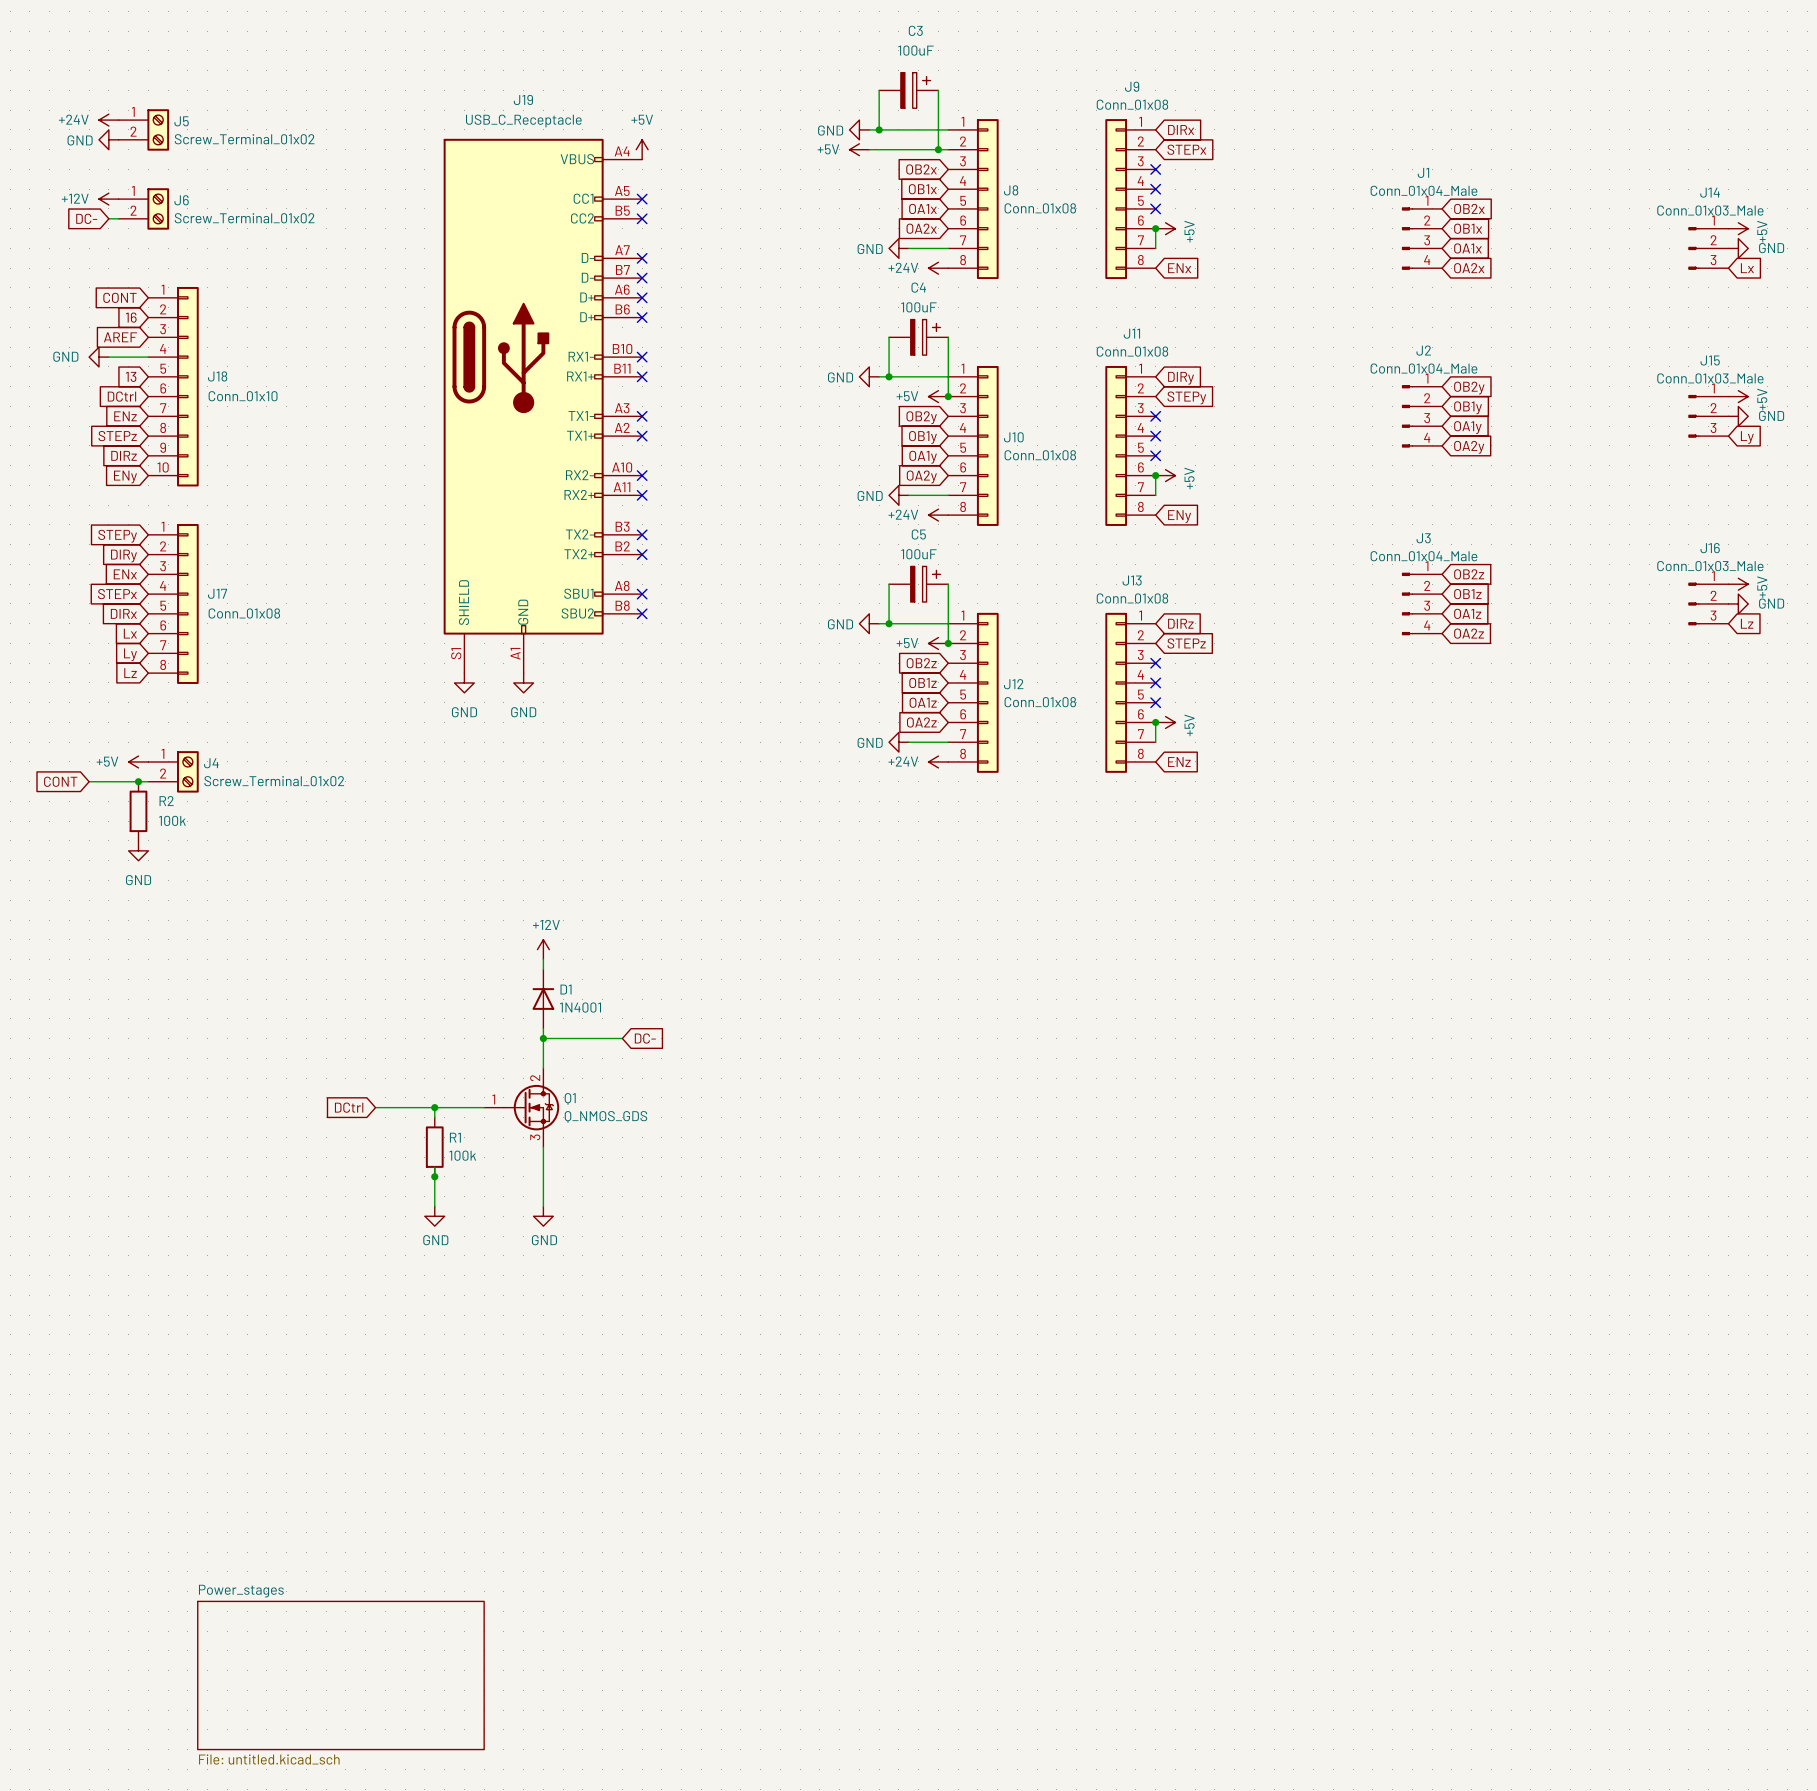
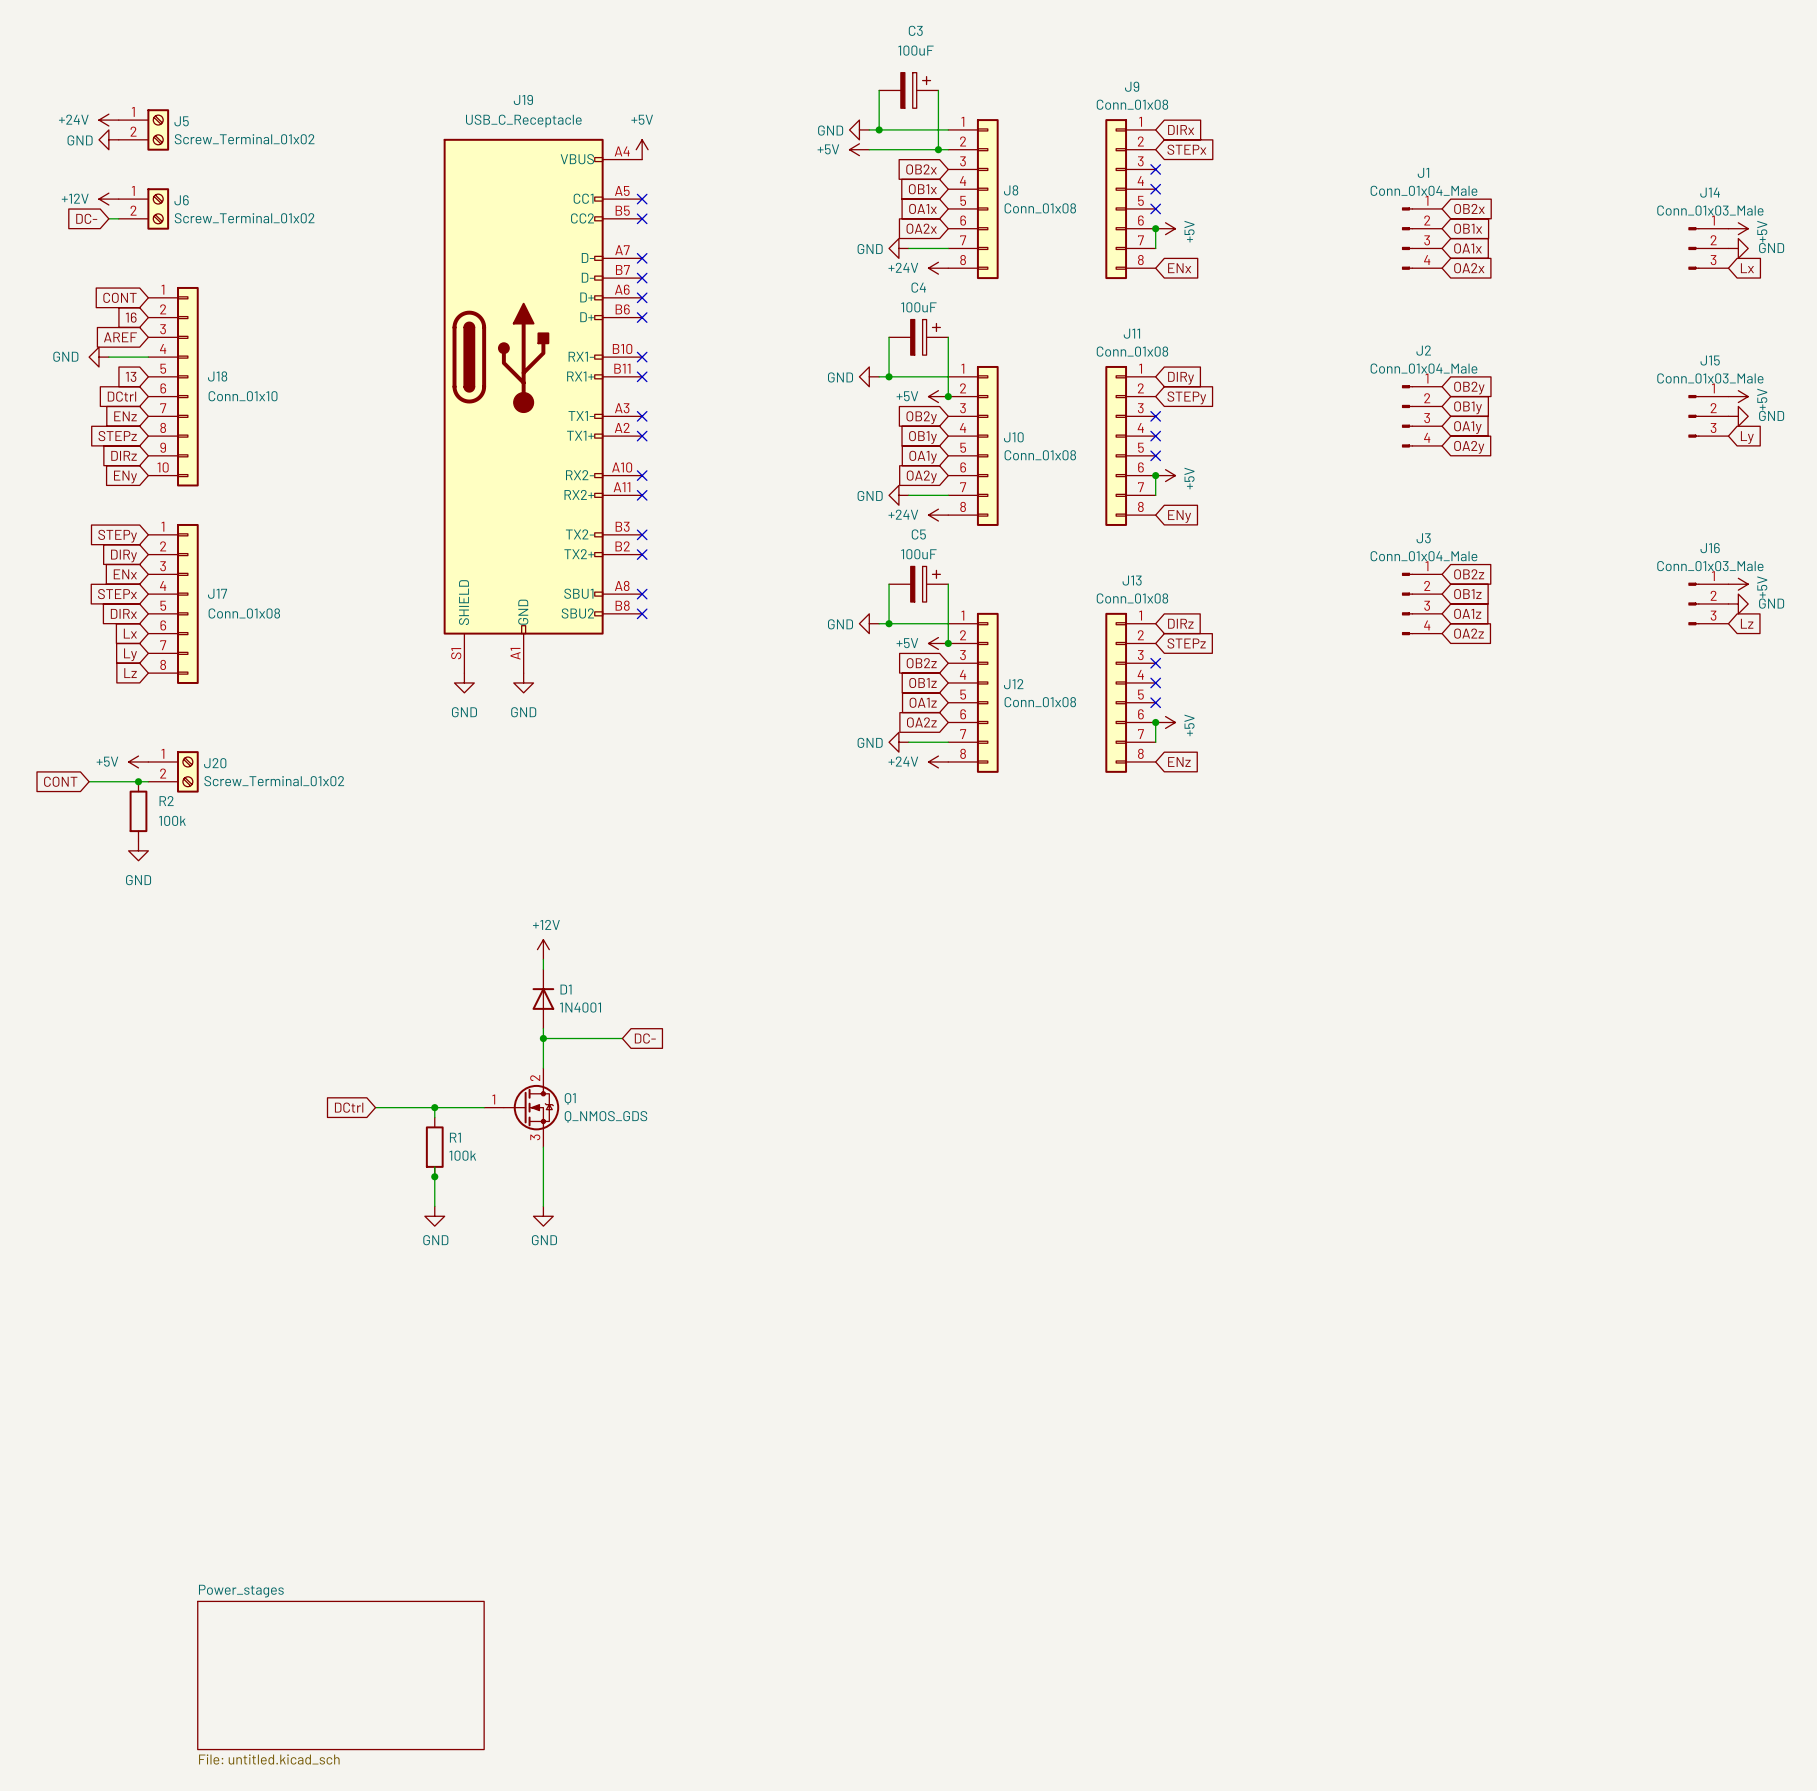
J4 name: J4 (211, 763) -> J20 (215, 763)

